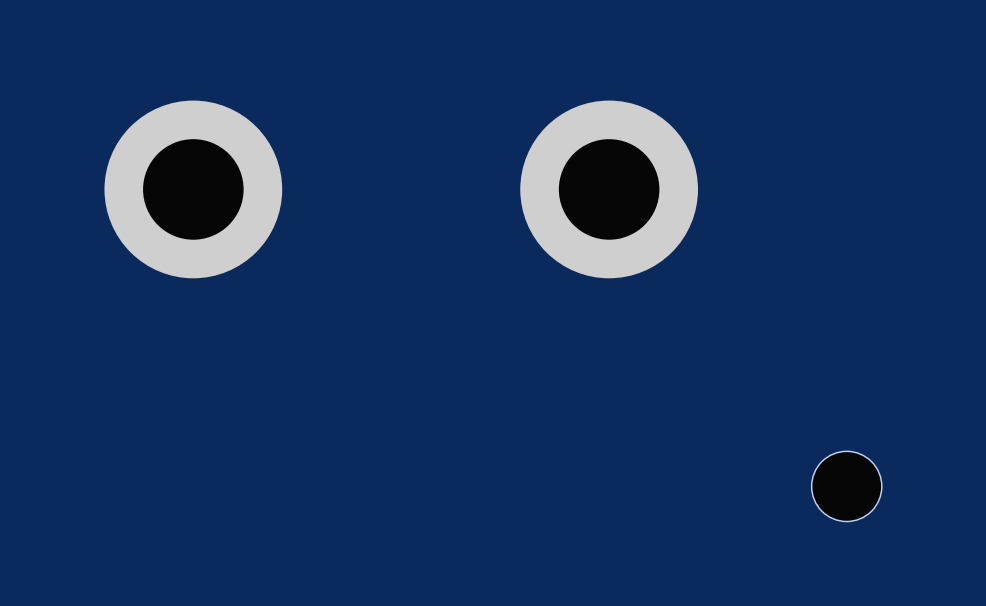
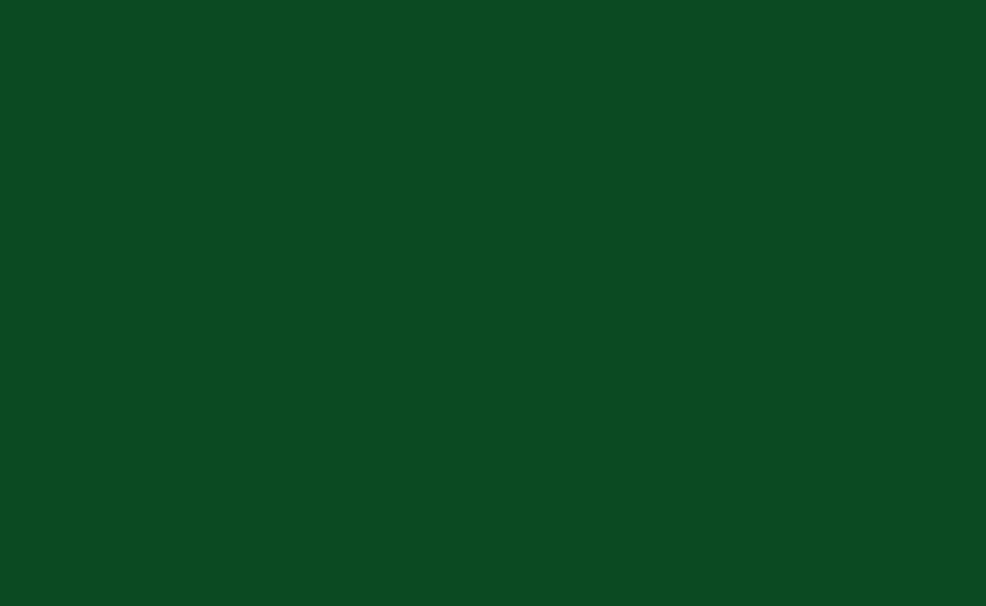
part: (193, 189) -> none
part: (609, 189) -> none
part: (846, 486) -> none

